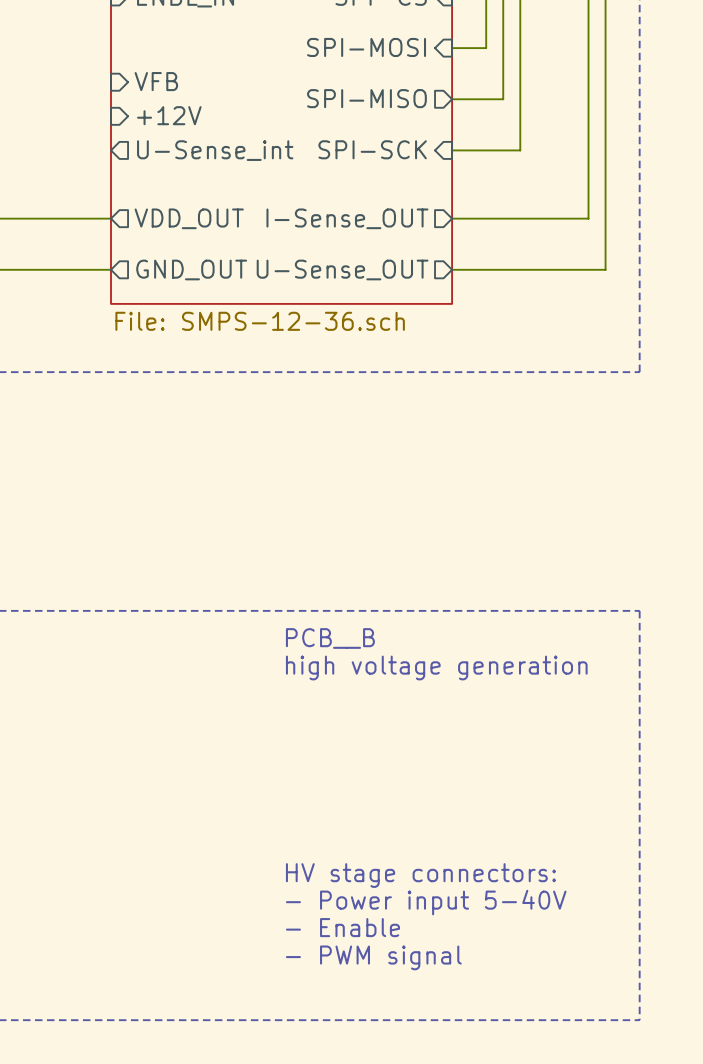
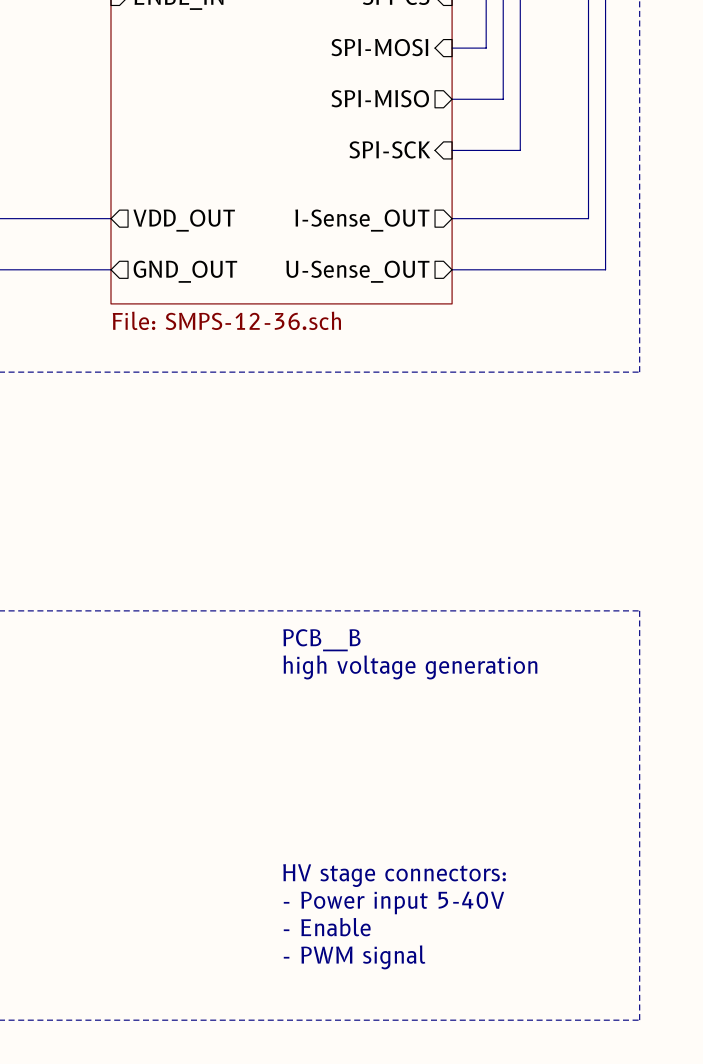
sheet pin: VFB (156, 81) -> none
sheet pin: +12V (169, 115) -> none
sheet pin: U-Sense_int (215, 150) -> none

